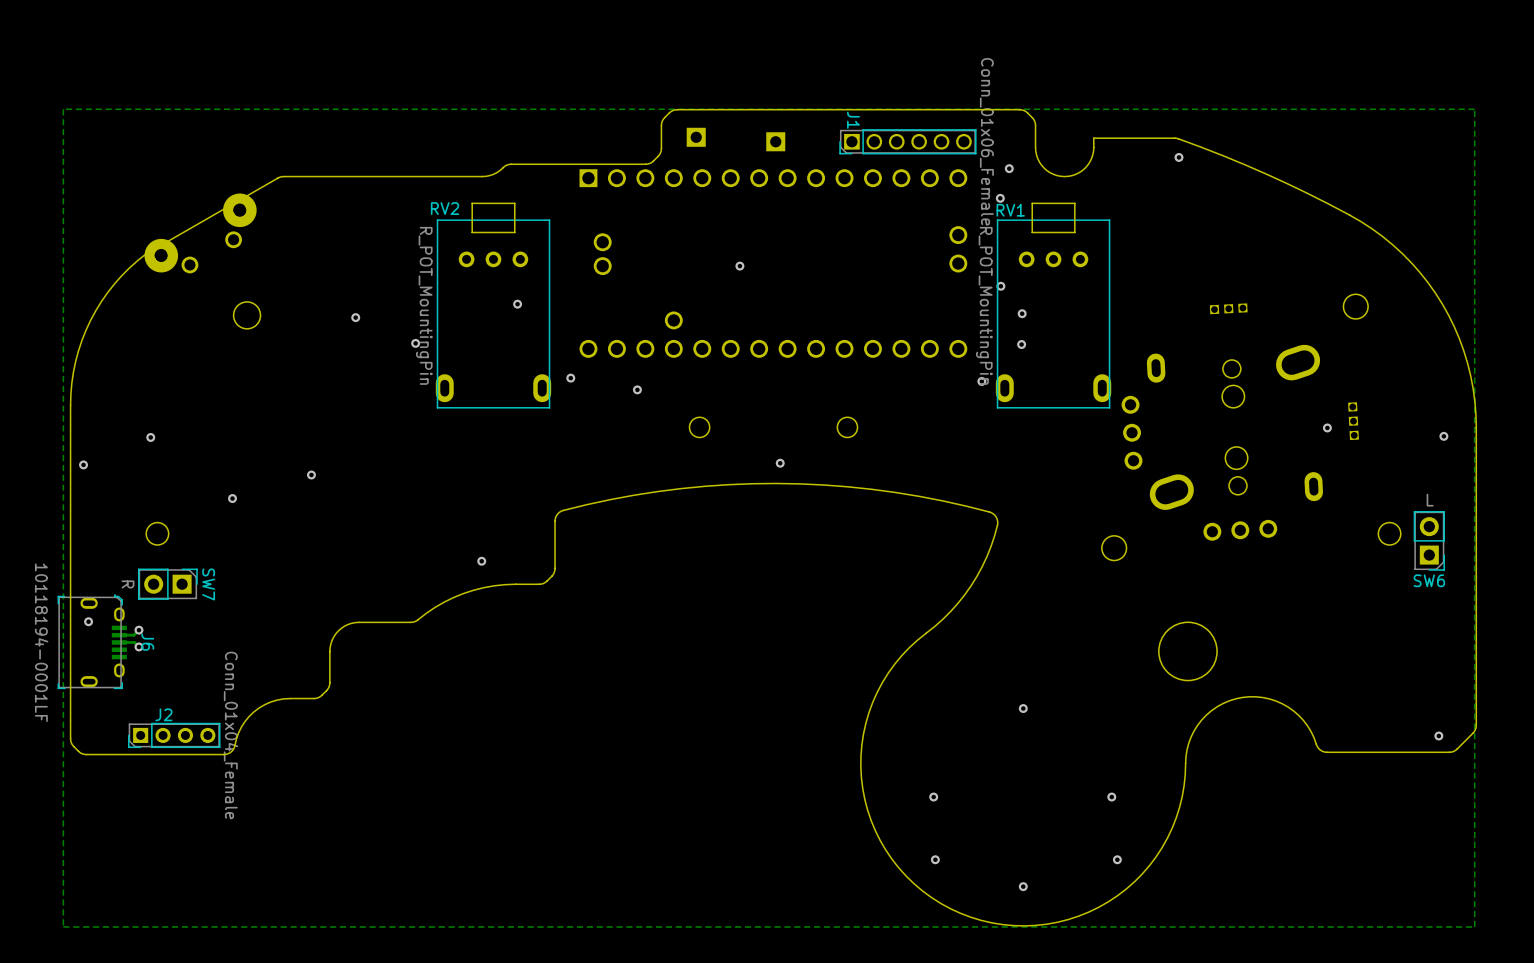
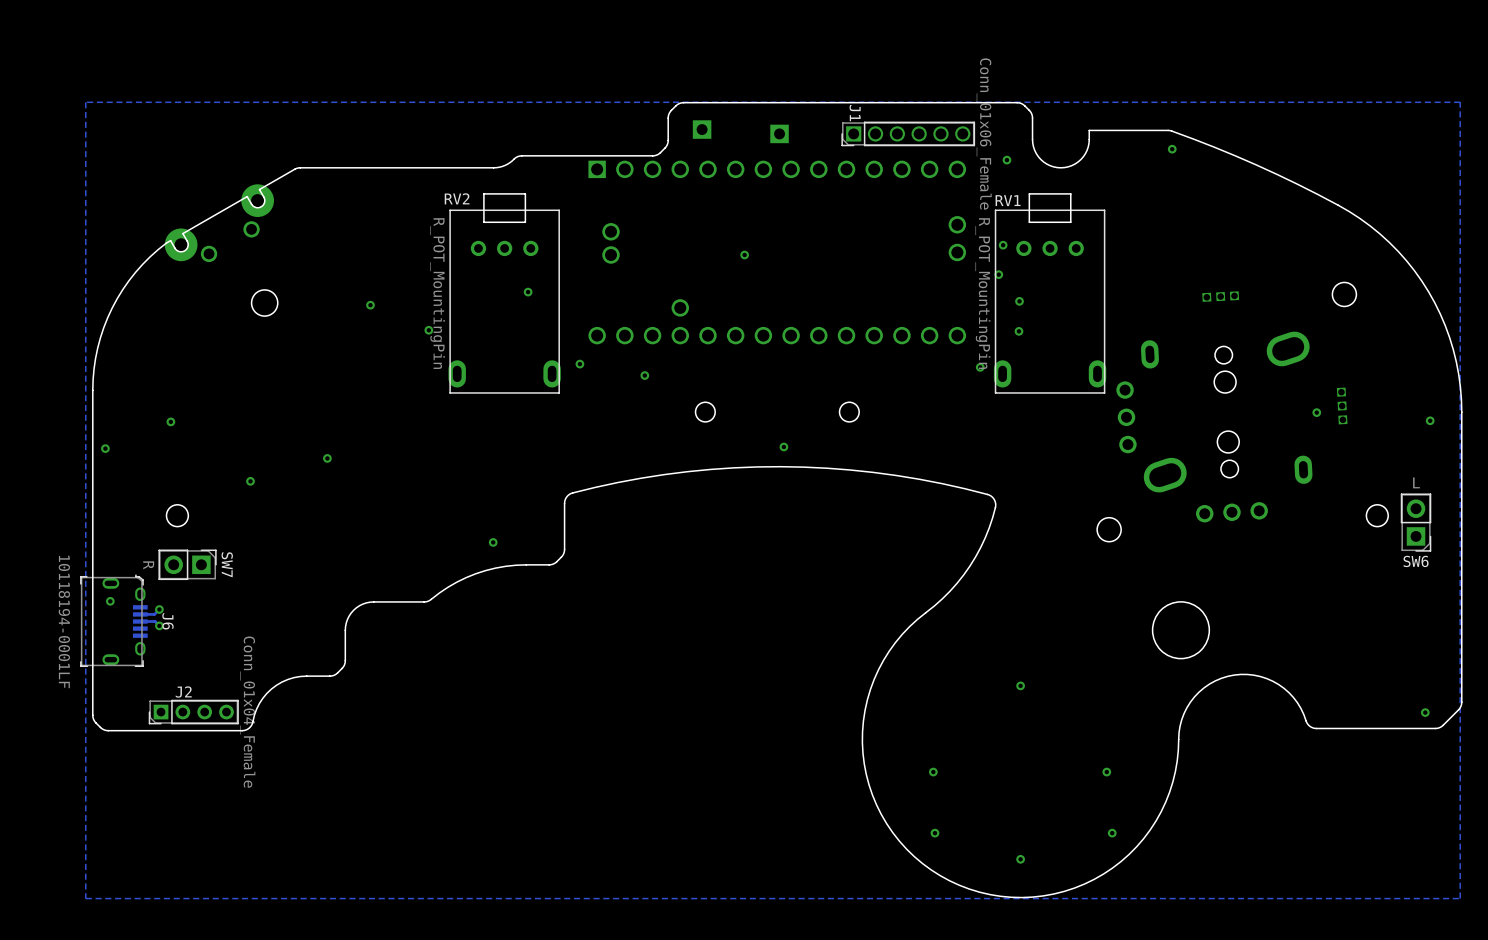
via position: (1000, 198) -> (1003, 245)

